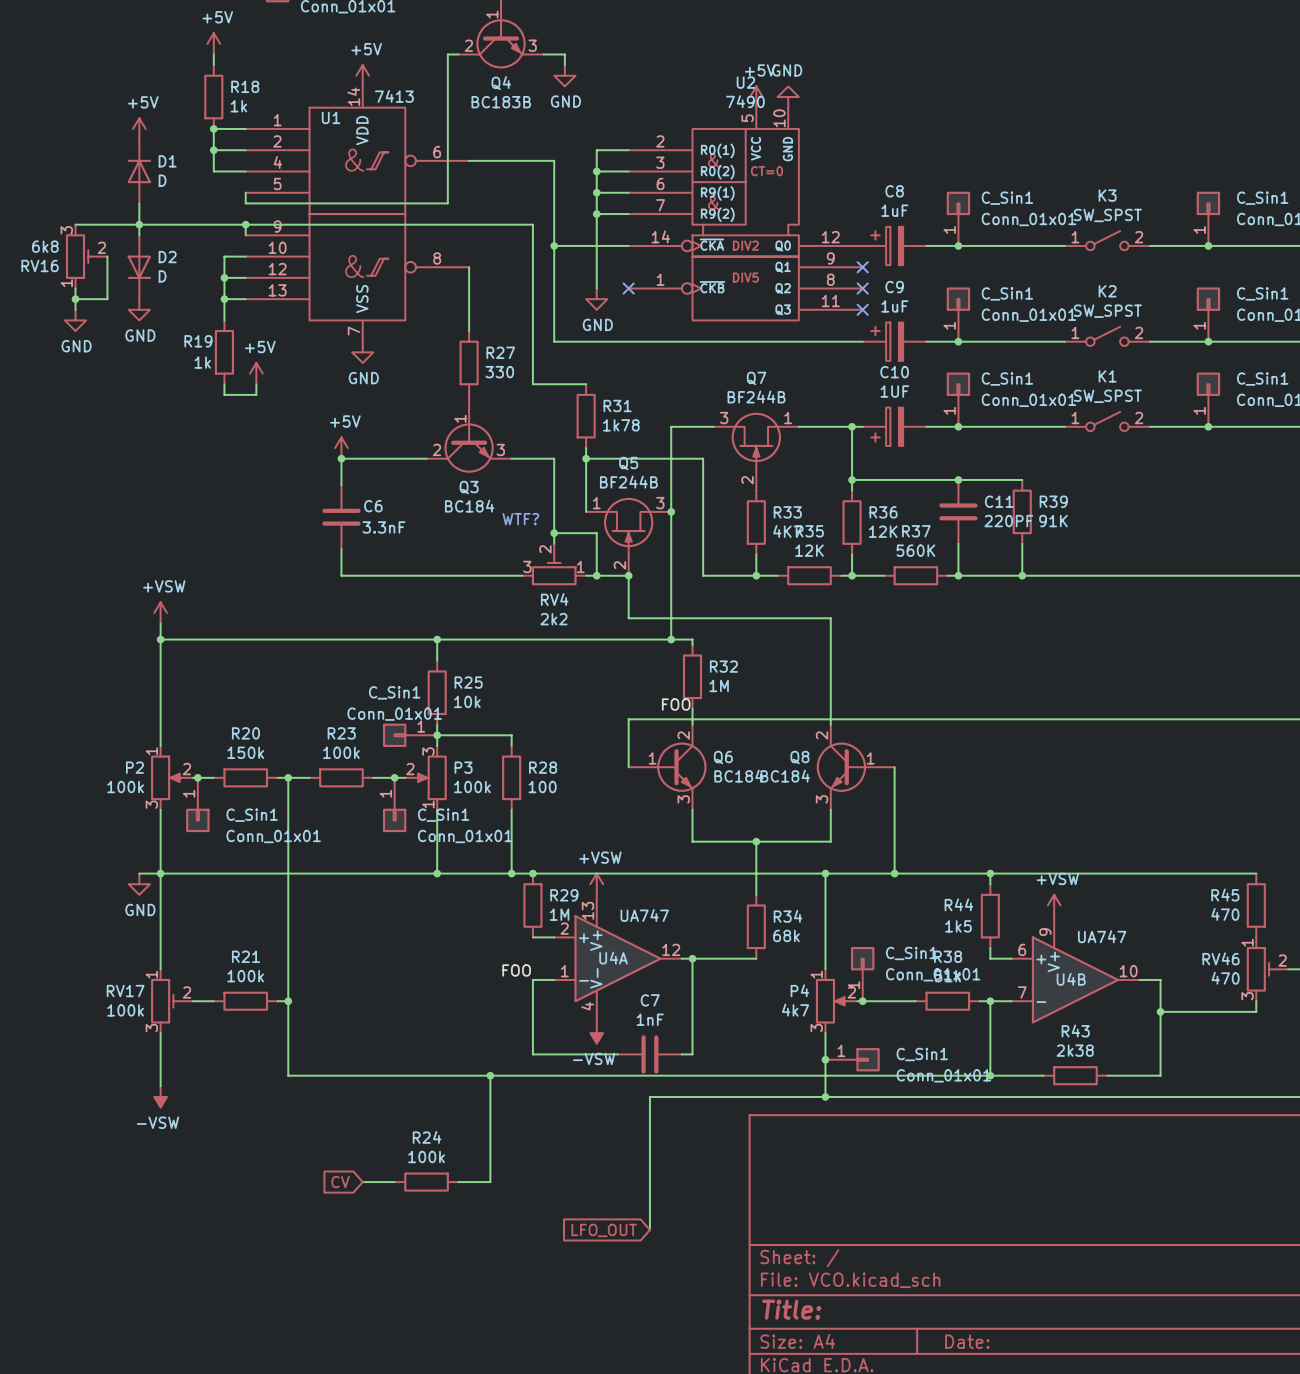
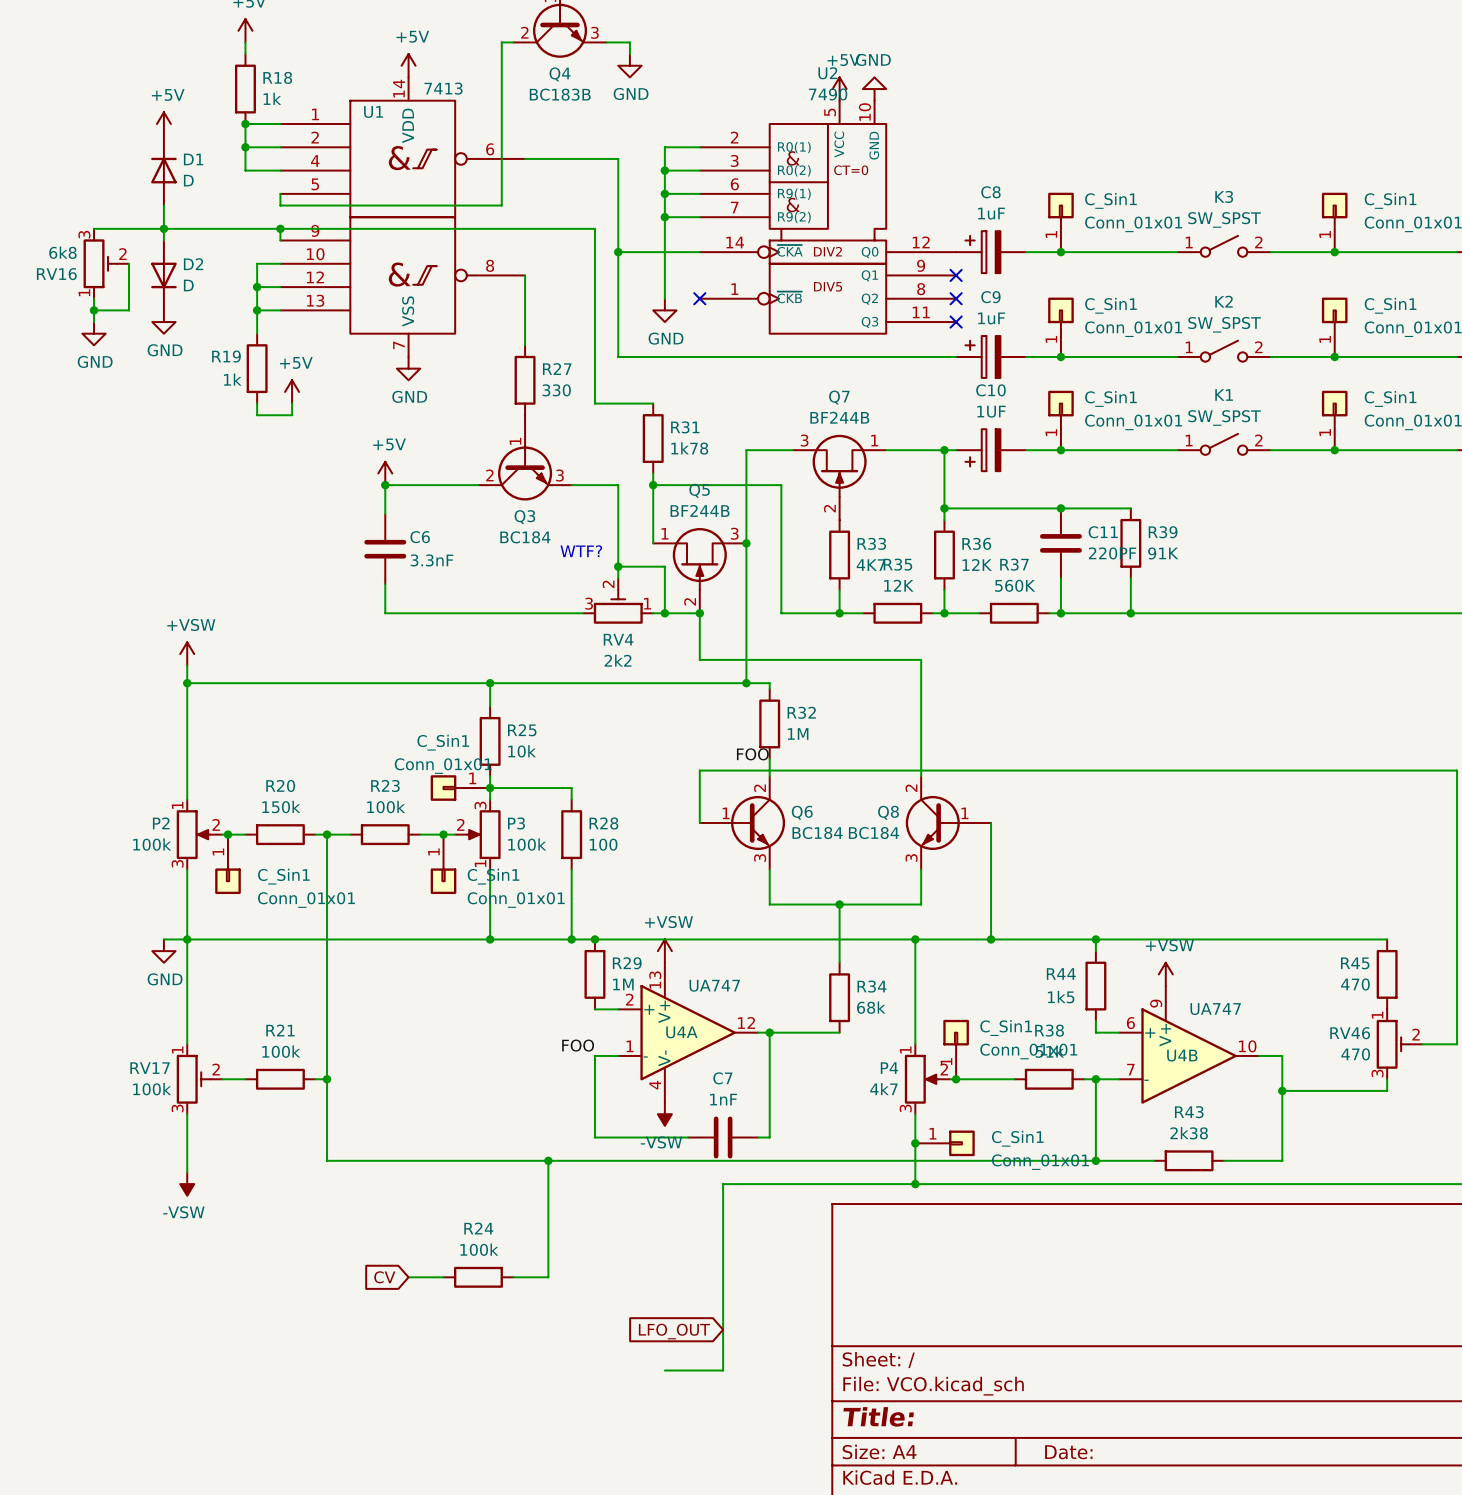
wire: none -> (723, 1329) (723, 1370) (664, 1370)

